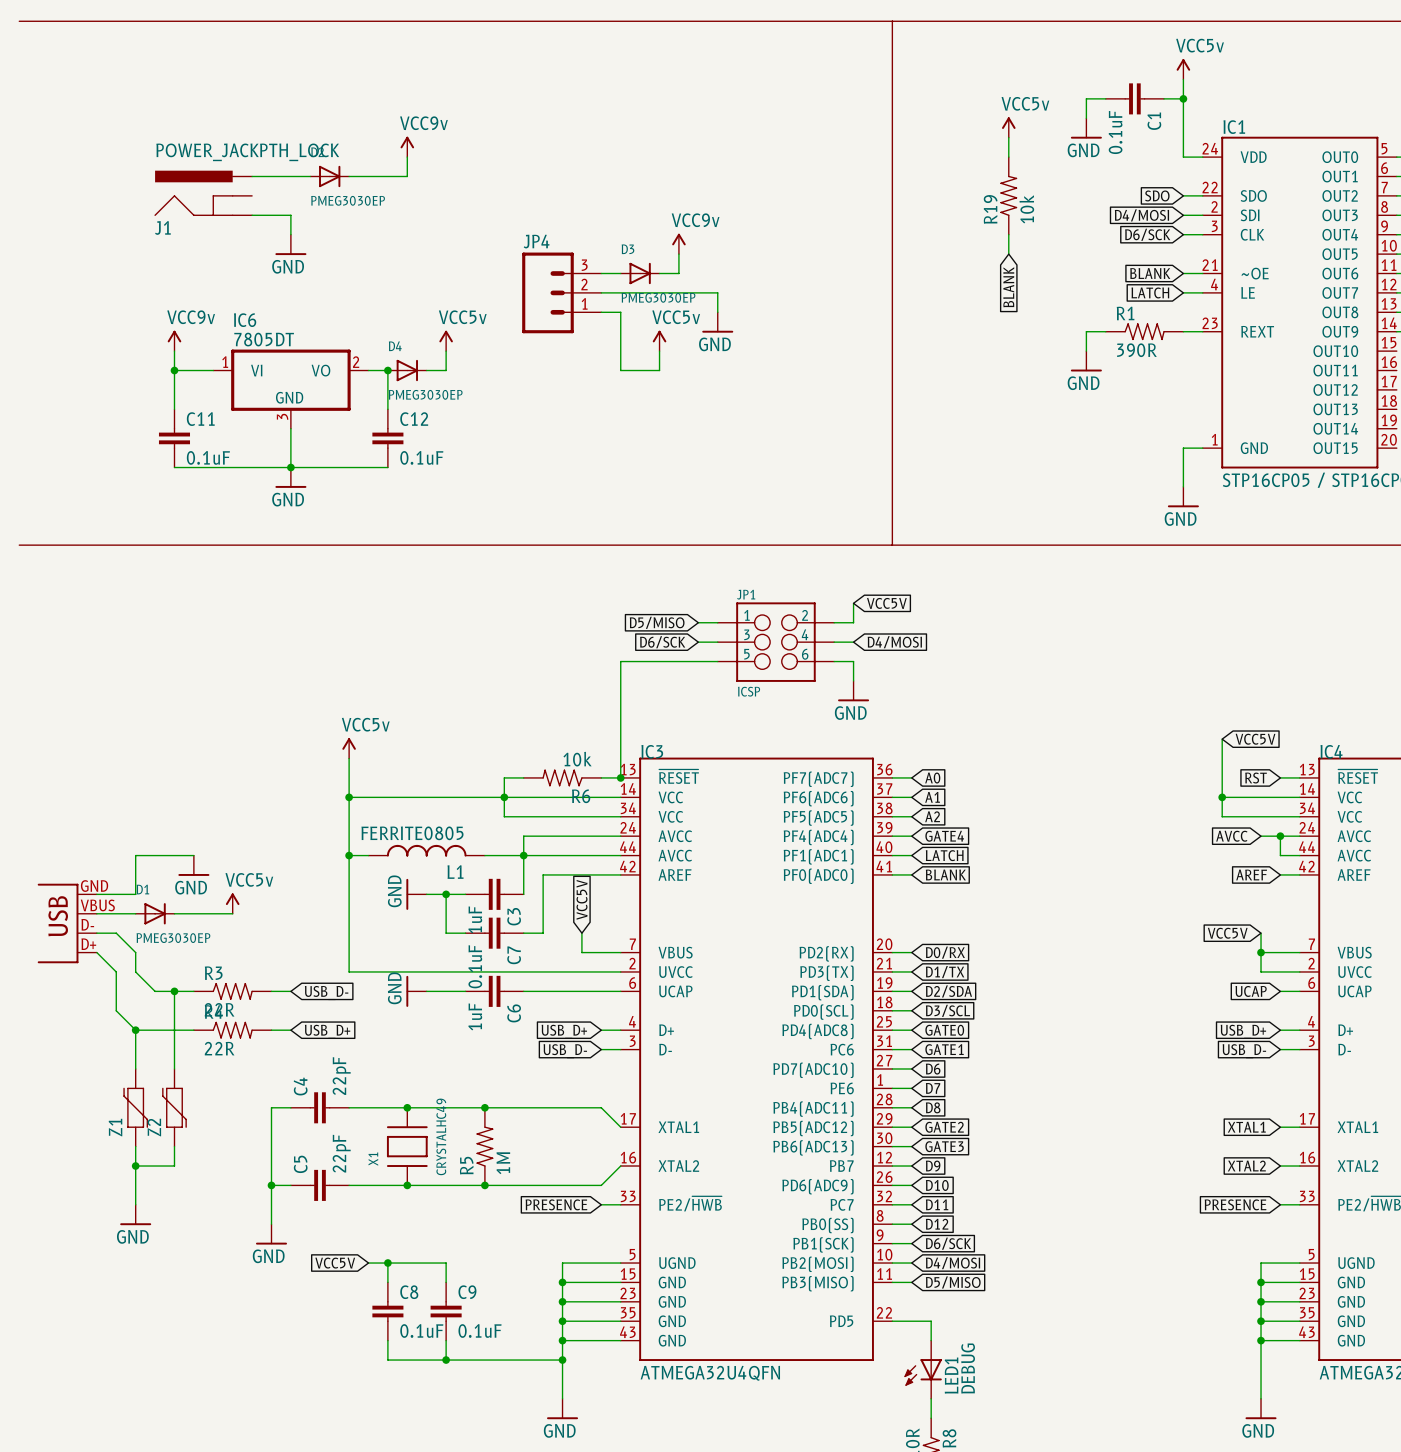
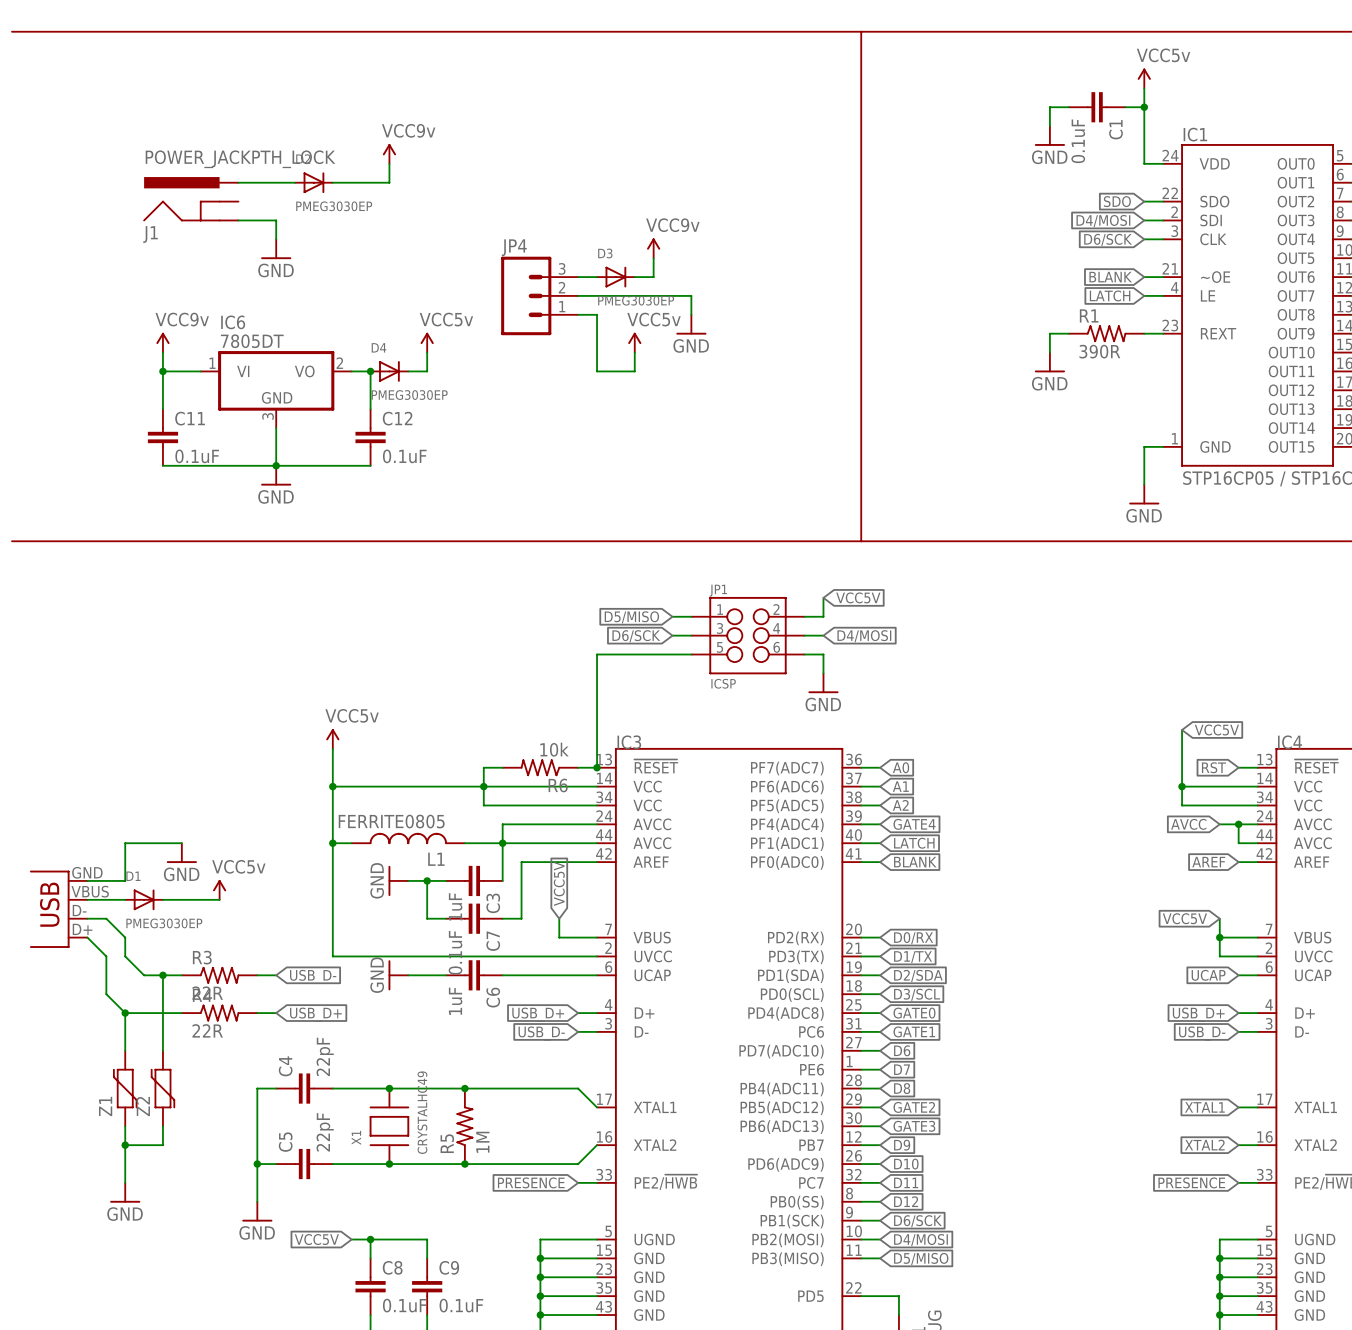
power symbol: VCC5v (1008, 127) -> none
wire: (1008, 137) (1008, 157) -> none
R19: 10k (1008, 195) -> none
wire: (1008, 234) (1008, 254) -> none
global label: BLANK (1008, 287) -> none

